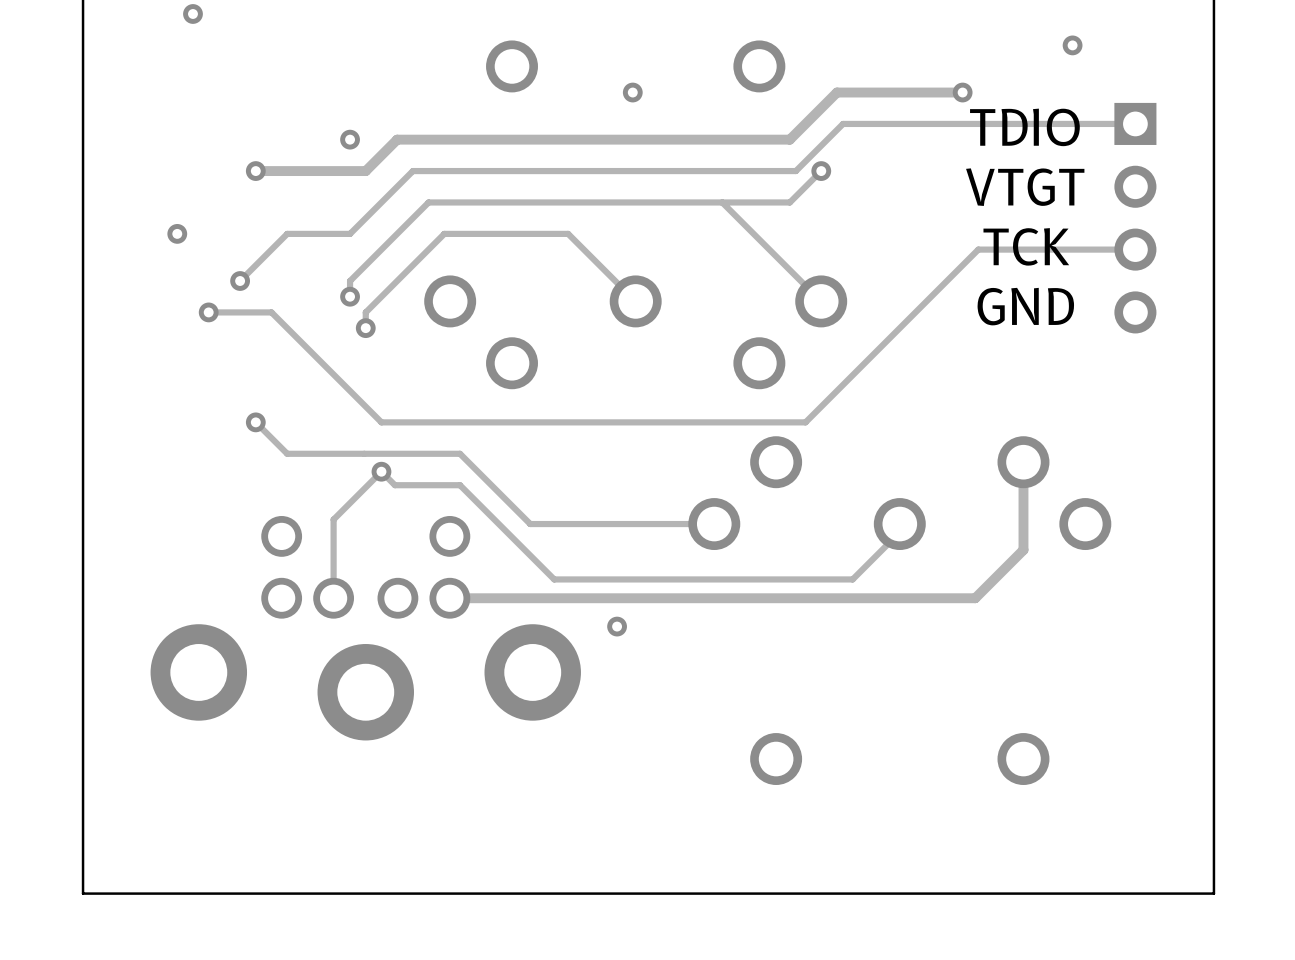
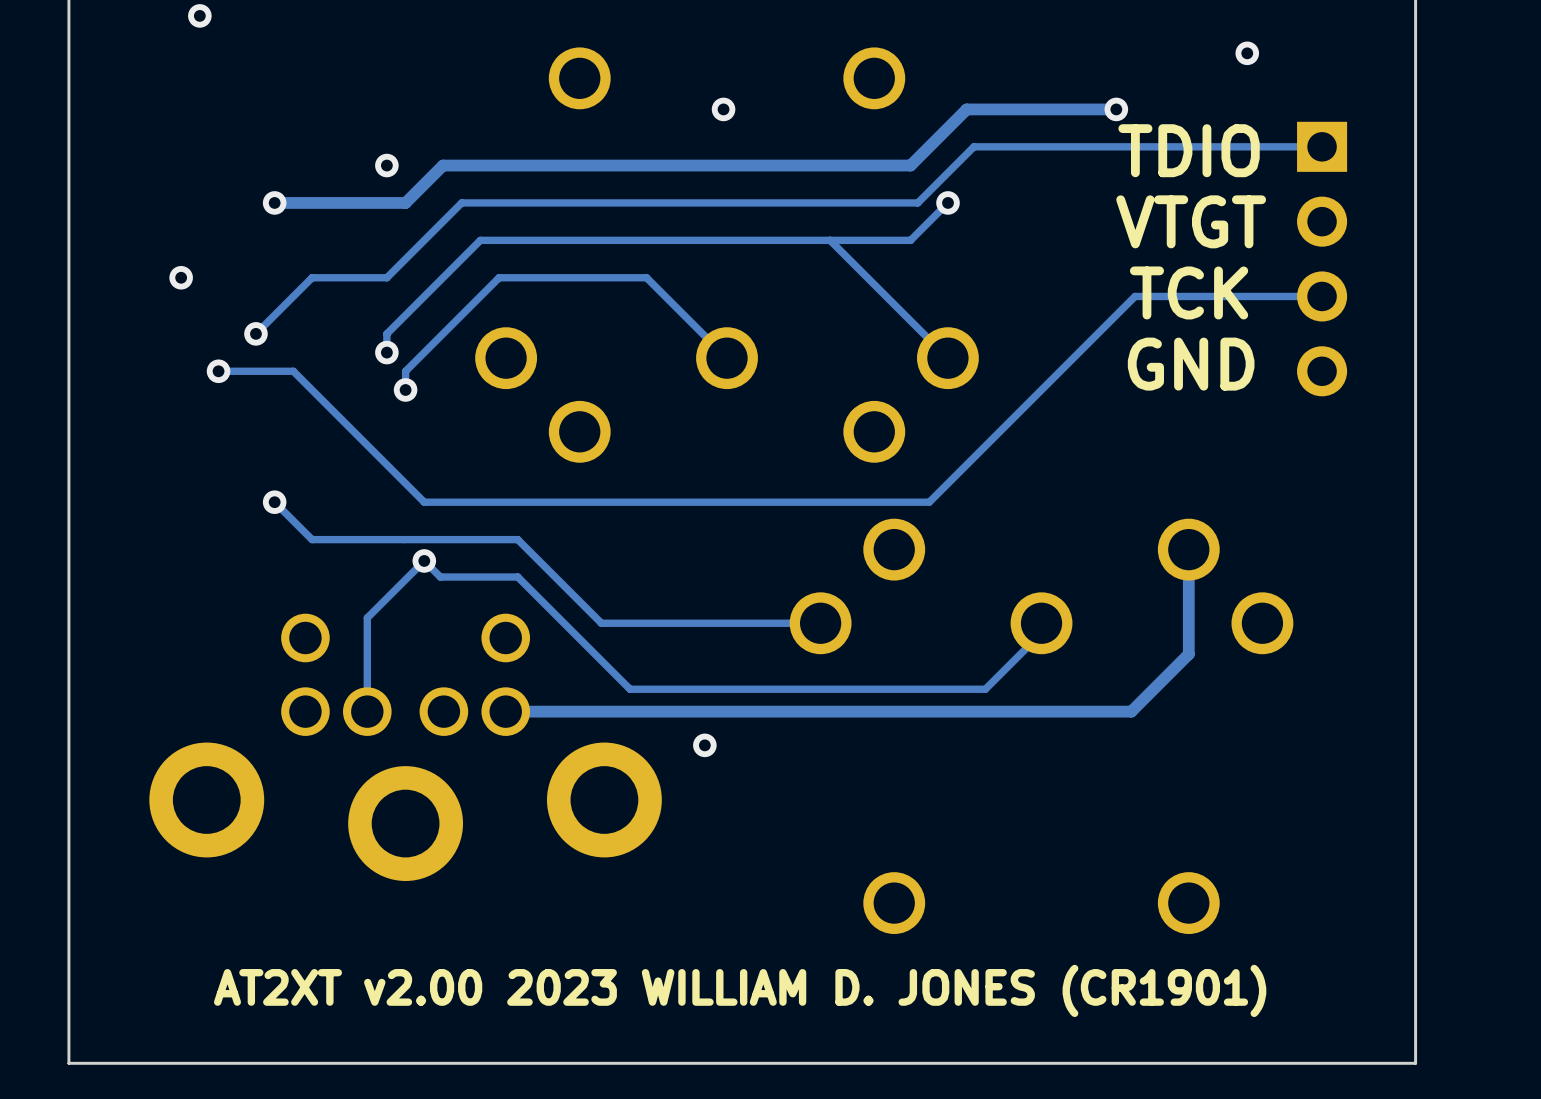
text: none -> AT2XT v2.00 2023 WILLIAM D. JONES (CR1901) (740, 990)

